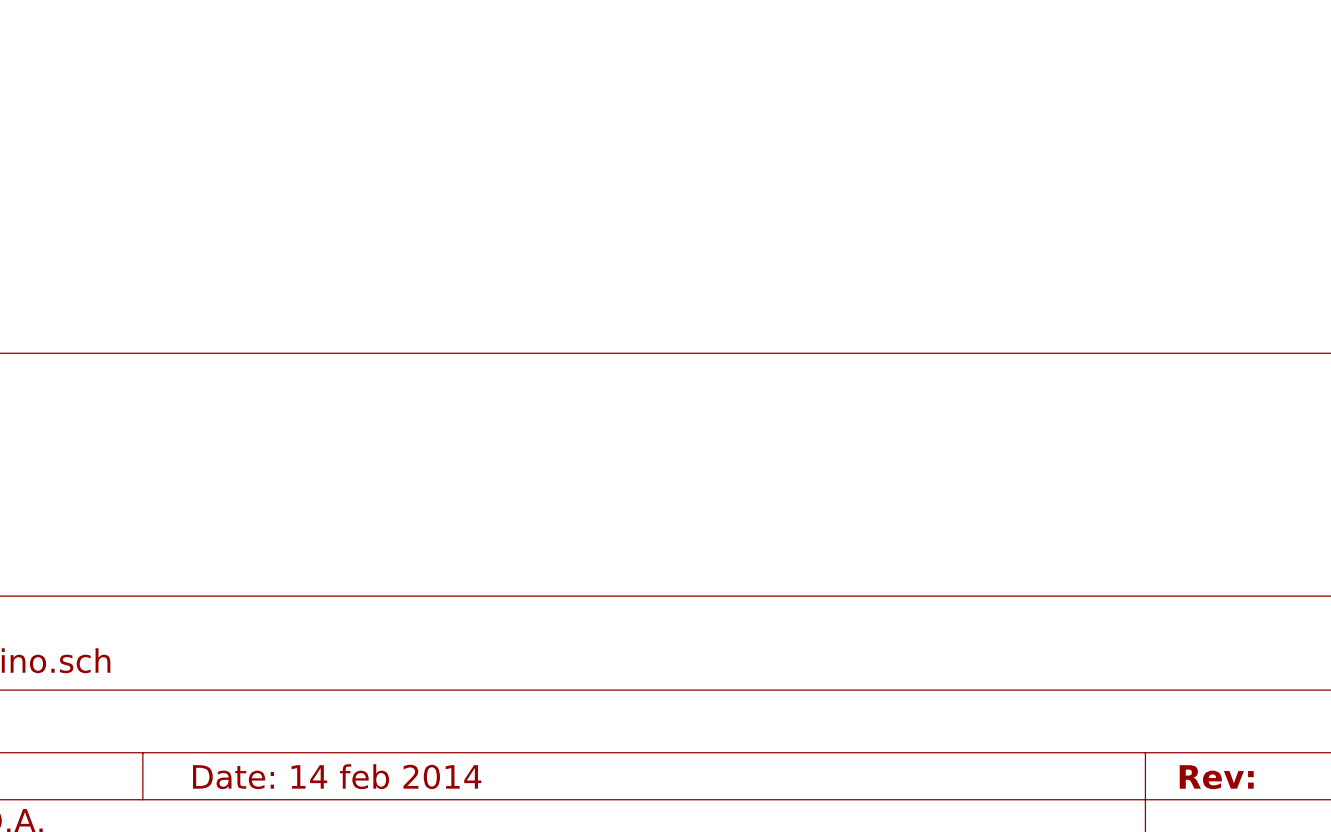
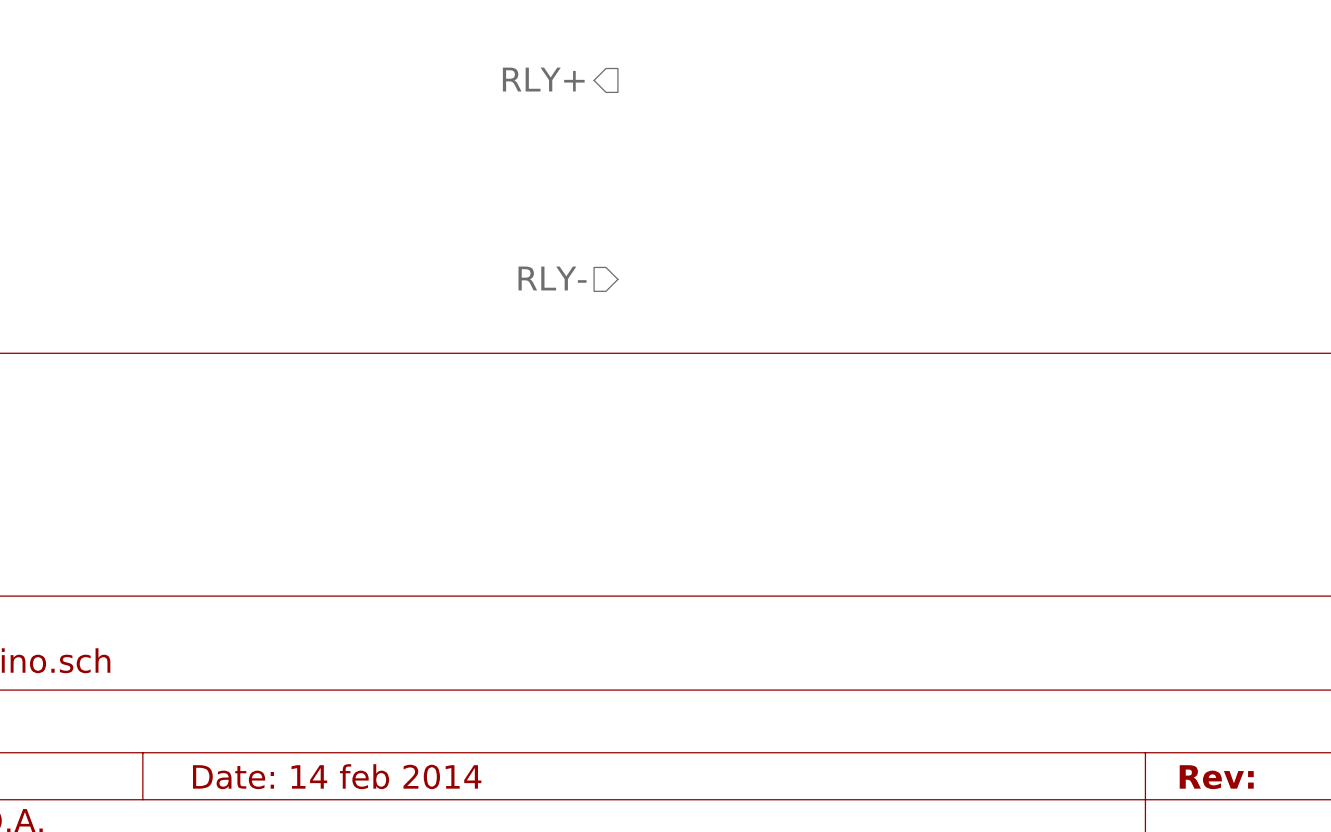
hierarchical label: none -> RLY+ (543, 79)
hierarchical label: none -> RLY- (552, 278)

